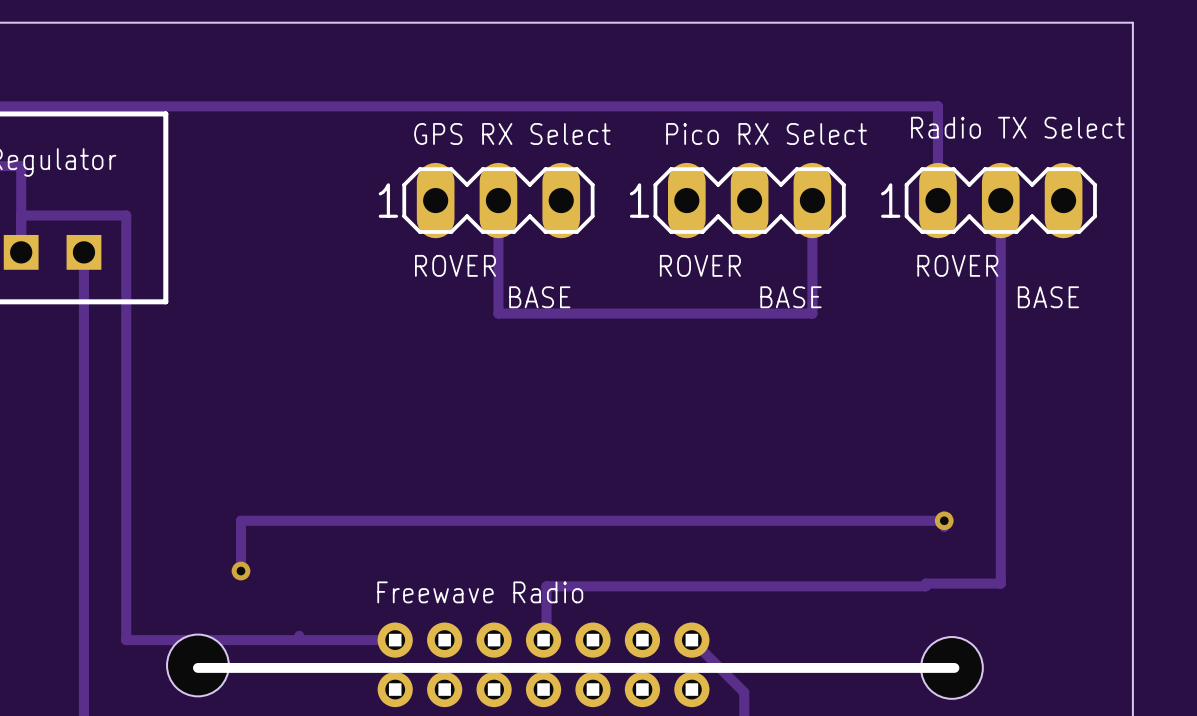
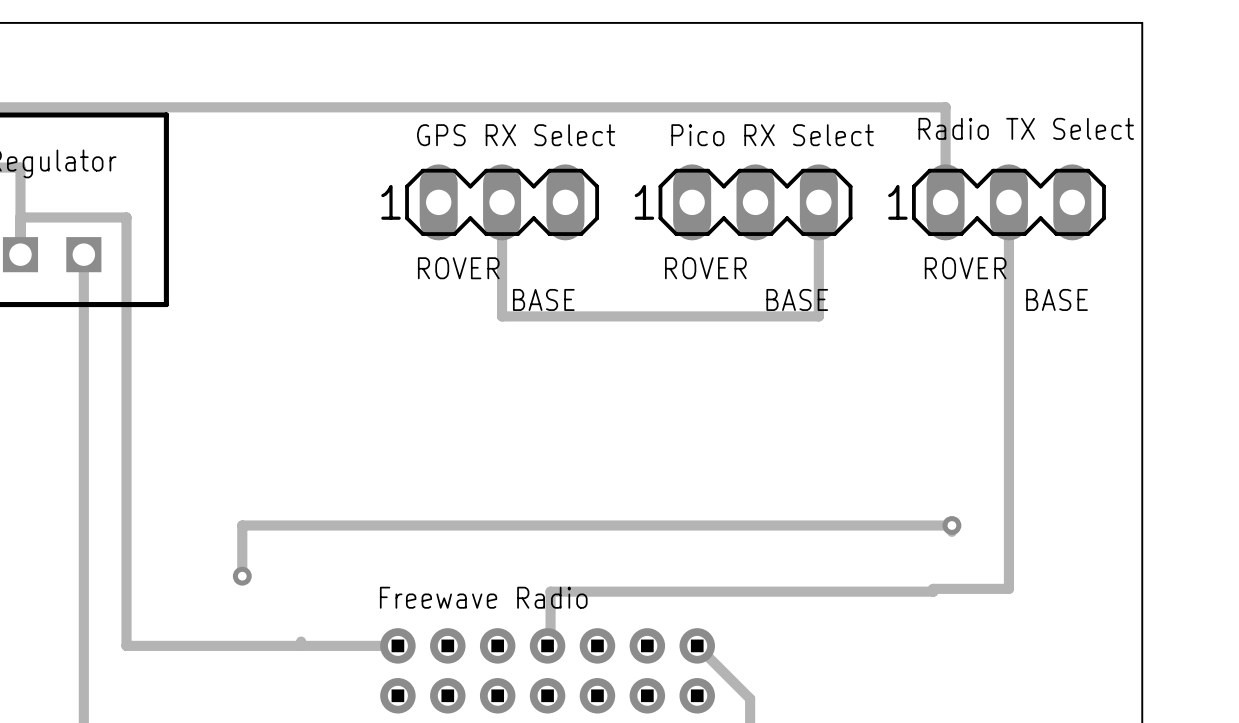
hole: (197, 665) -> none
line: (197, 667) (954, 667) -> none
hole: (951, 667) -> none

